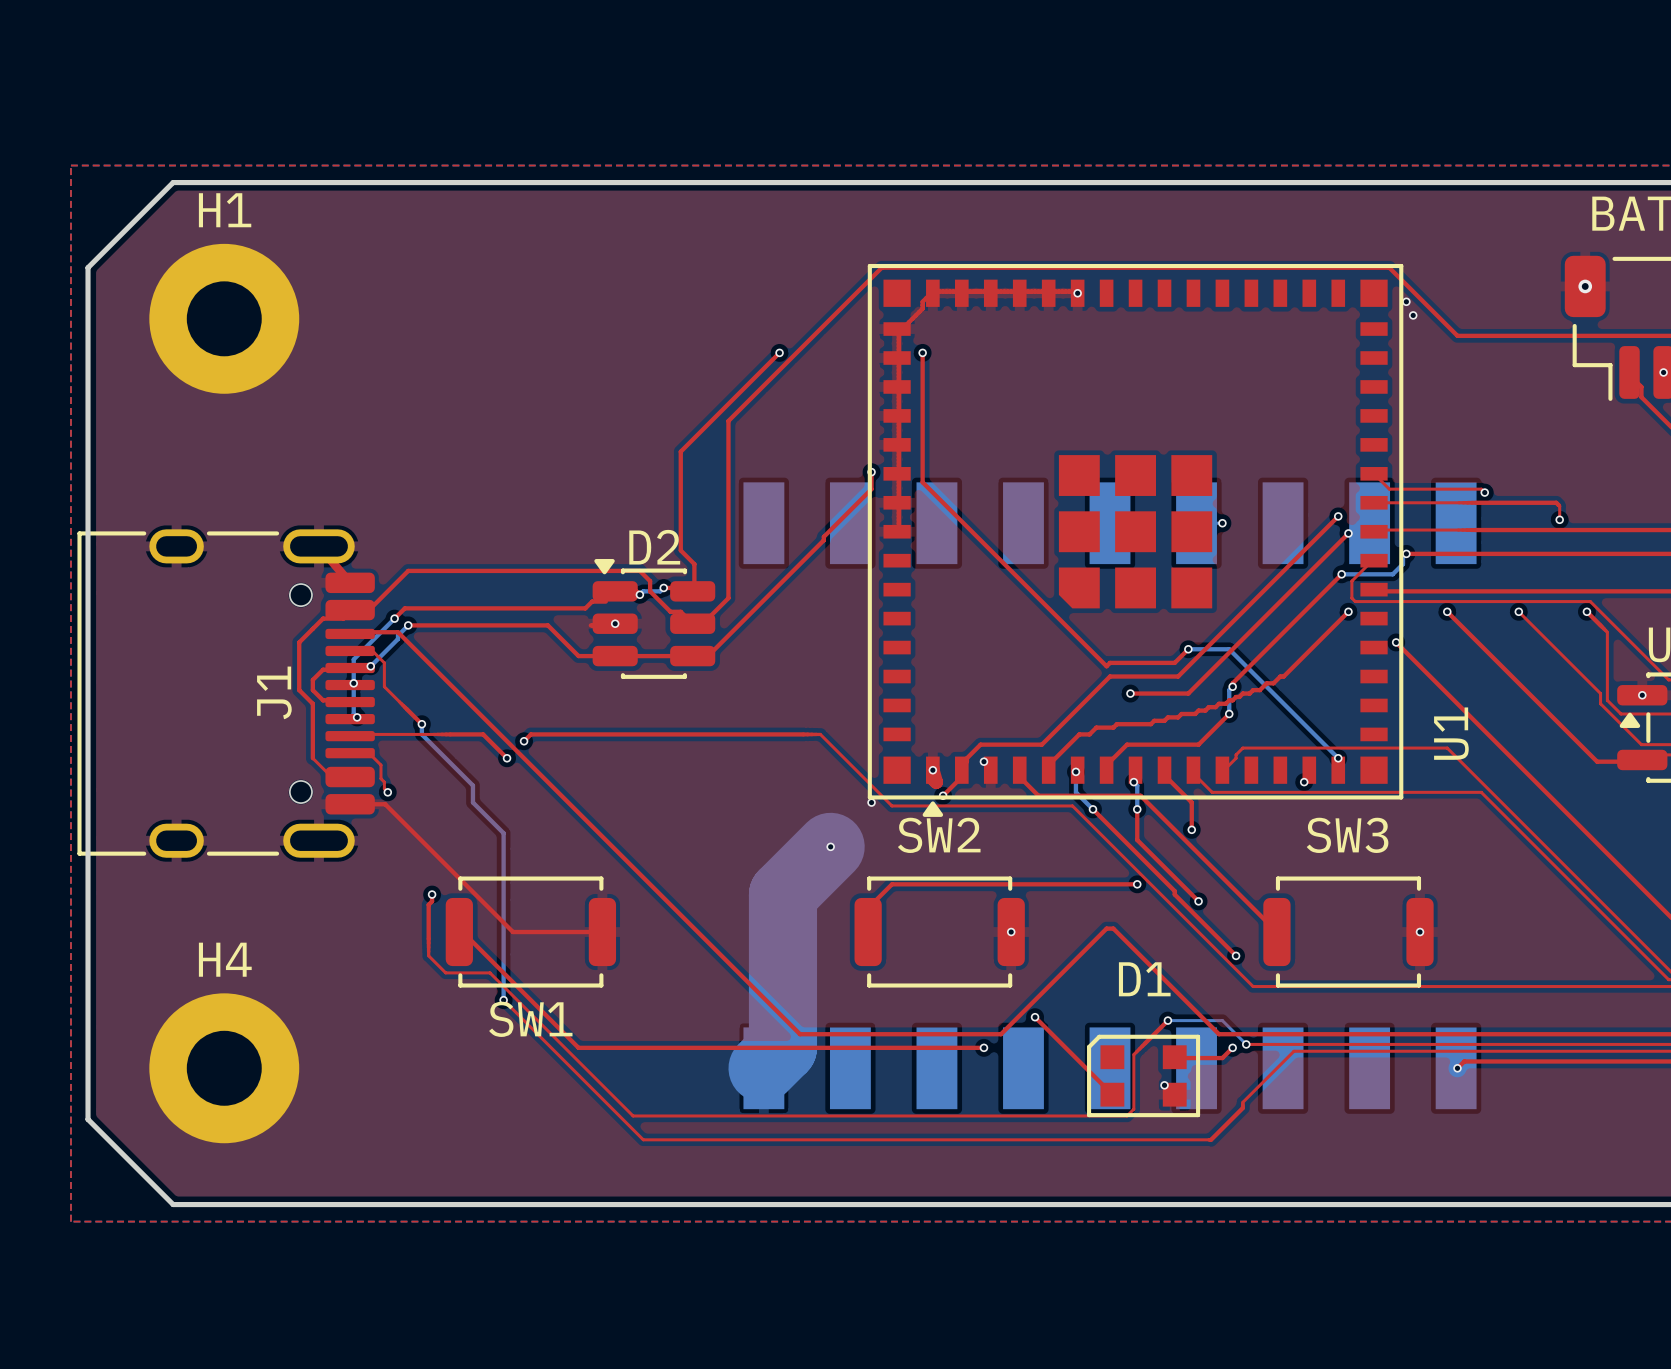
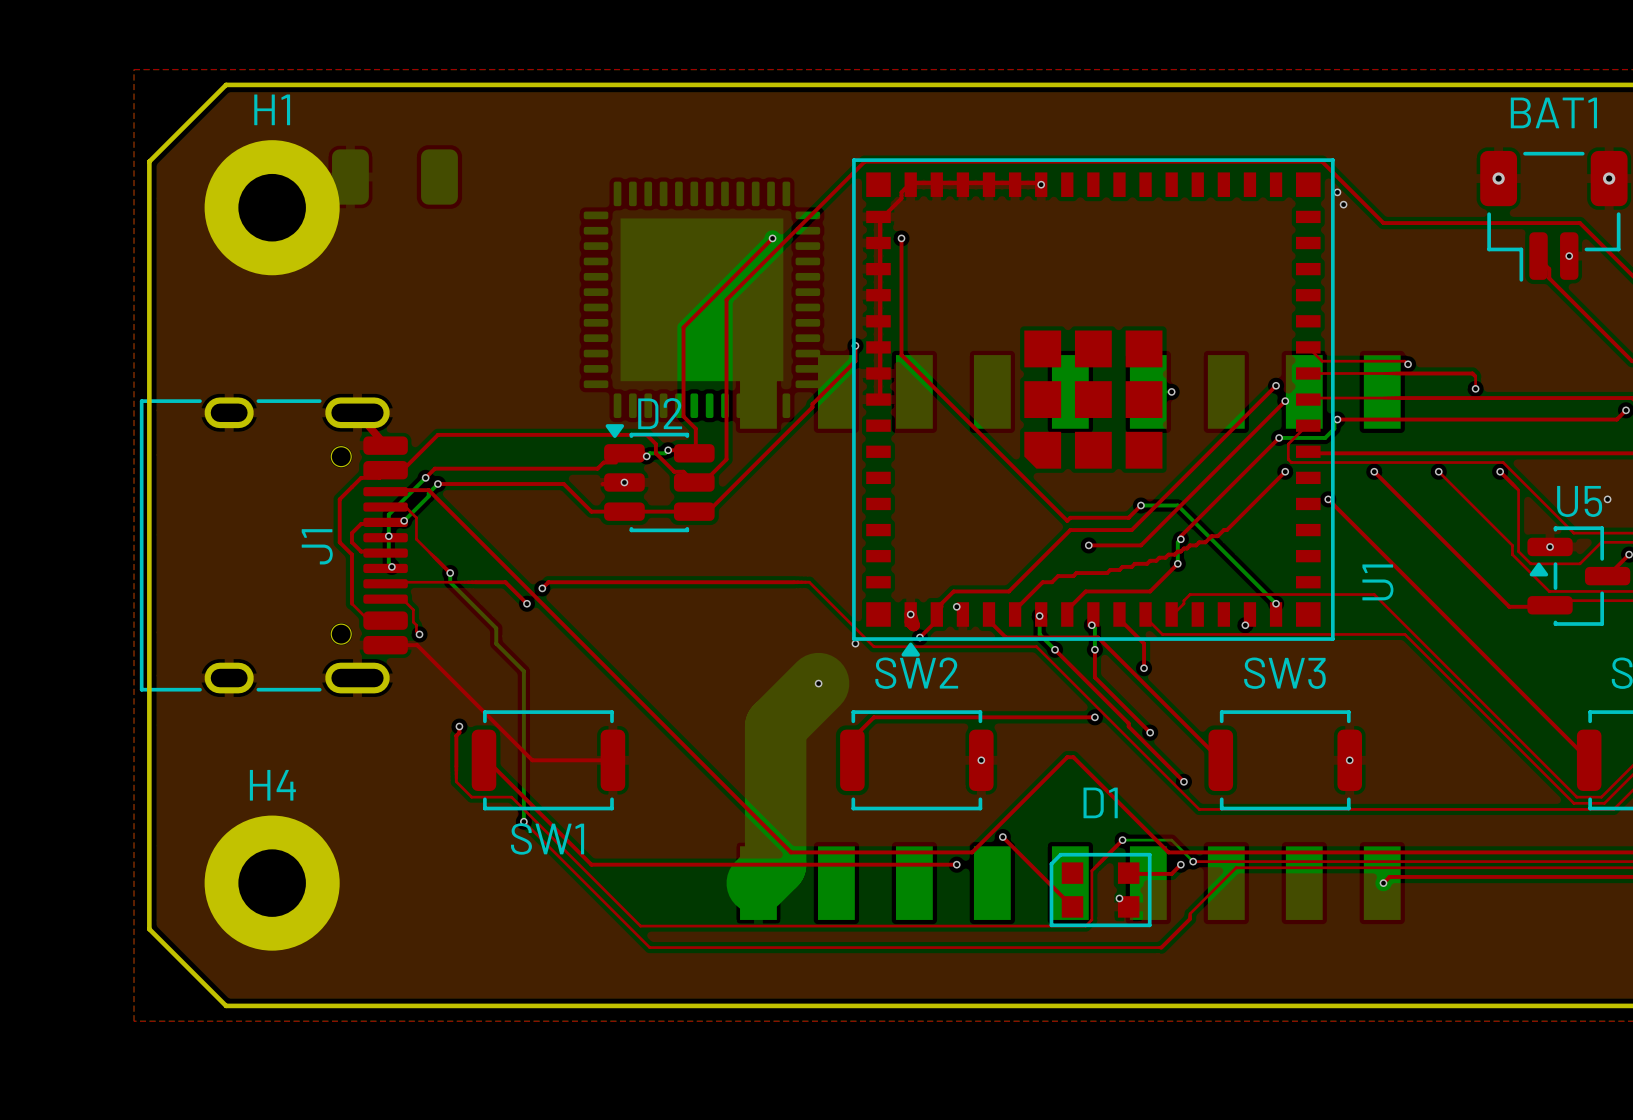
part: none -> (394, 177)
part: none -> (701, 299)

